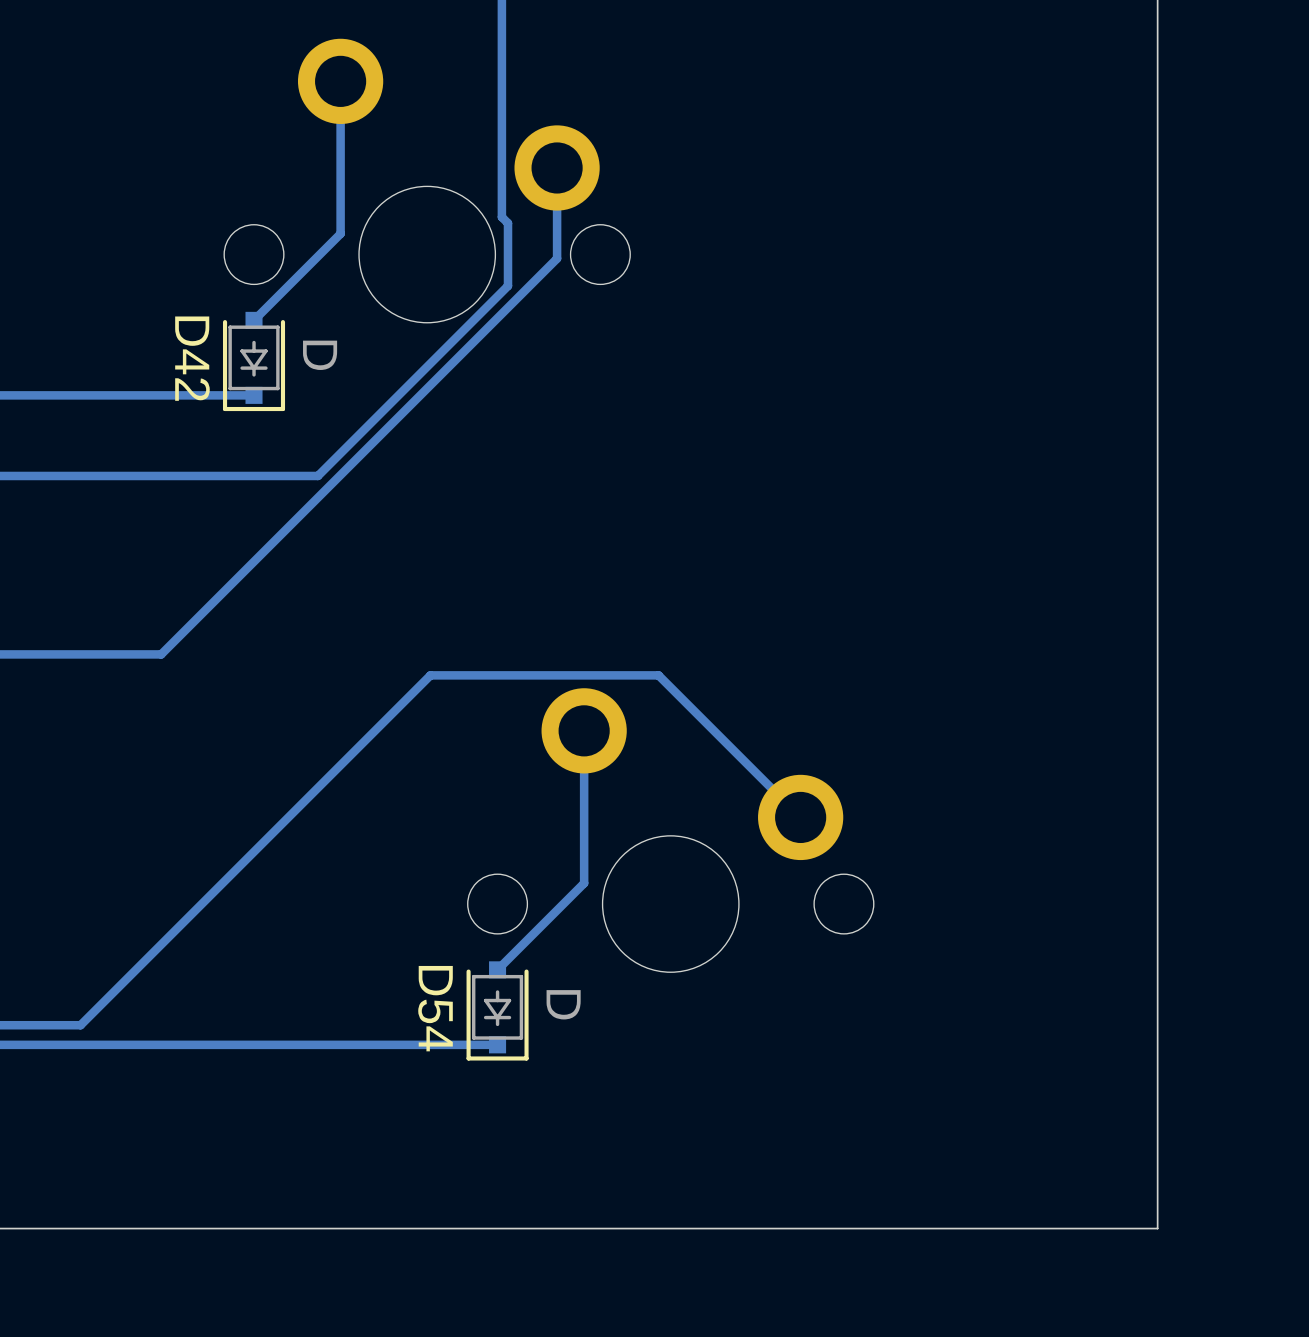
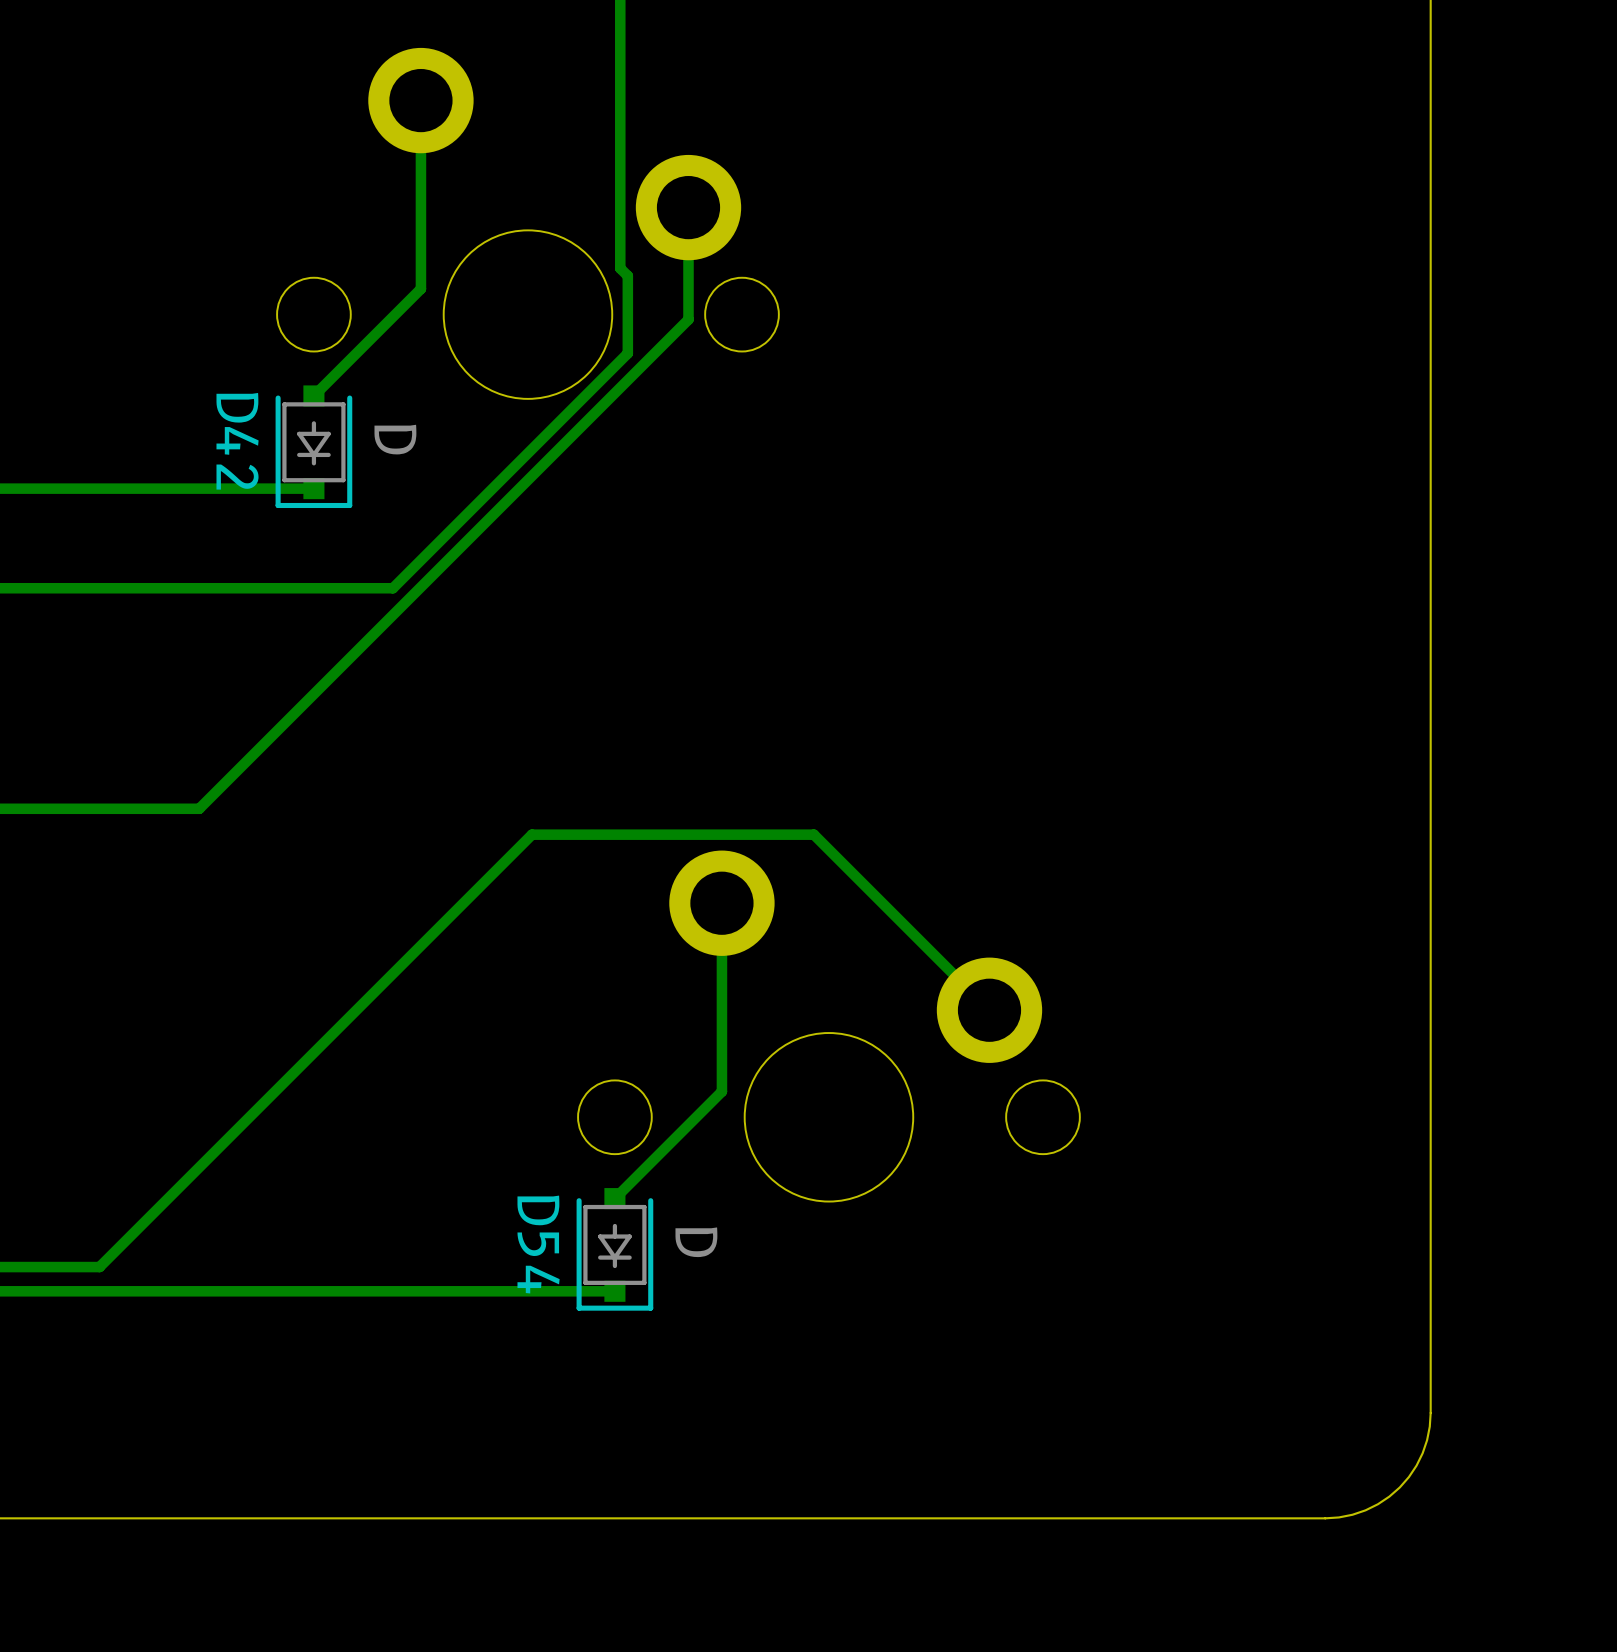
board edge: (1157, 1143) (1157, 1228) (1072, 1228) -> (1430, 1412) (1429, 1426) (1422, 1453) (1416, 1465) (1399, 1487) (1377, 1504) (1365, 1510) (1352, 1514) (1325, 1518)

